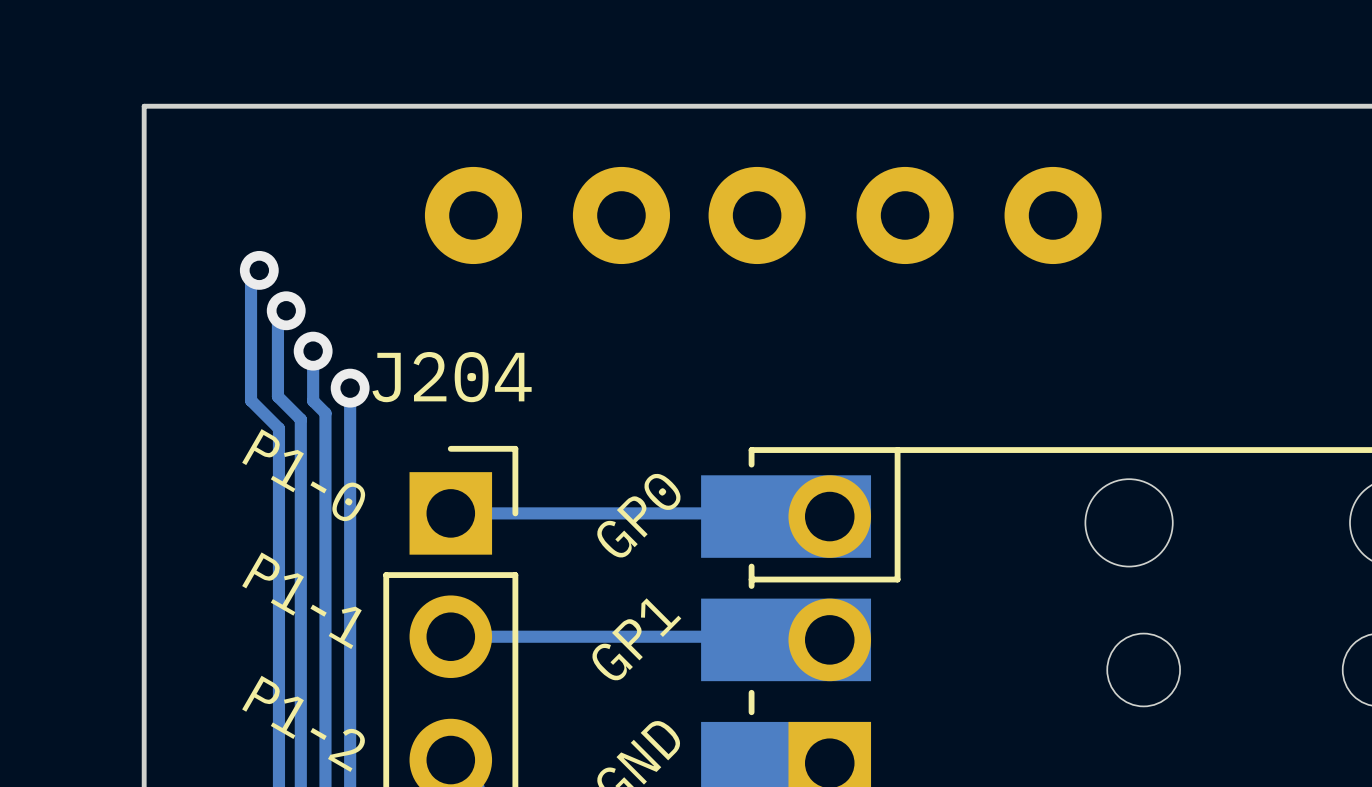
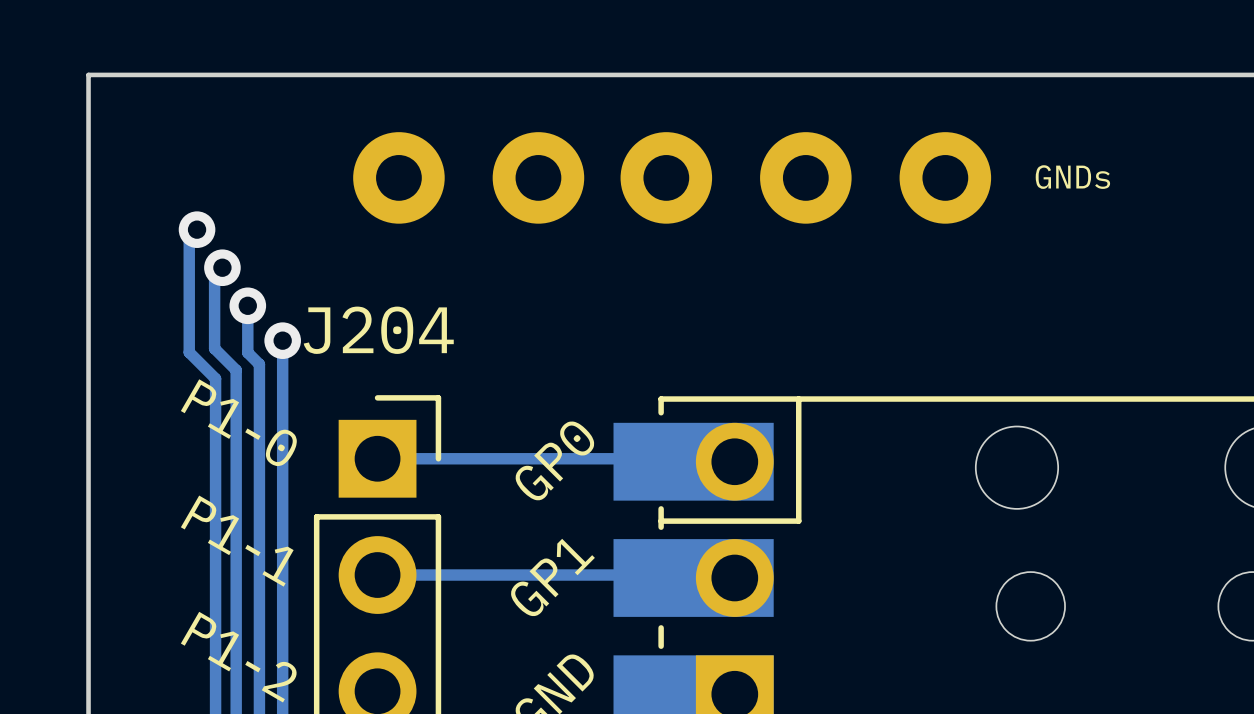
text: none -> GNDs (1072, 177)

